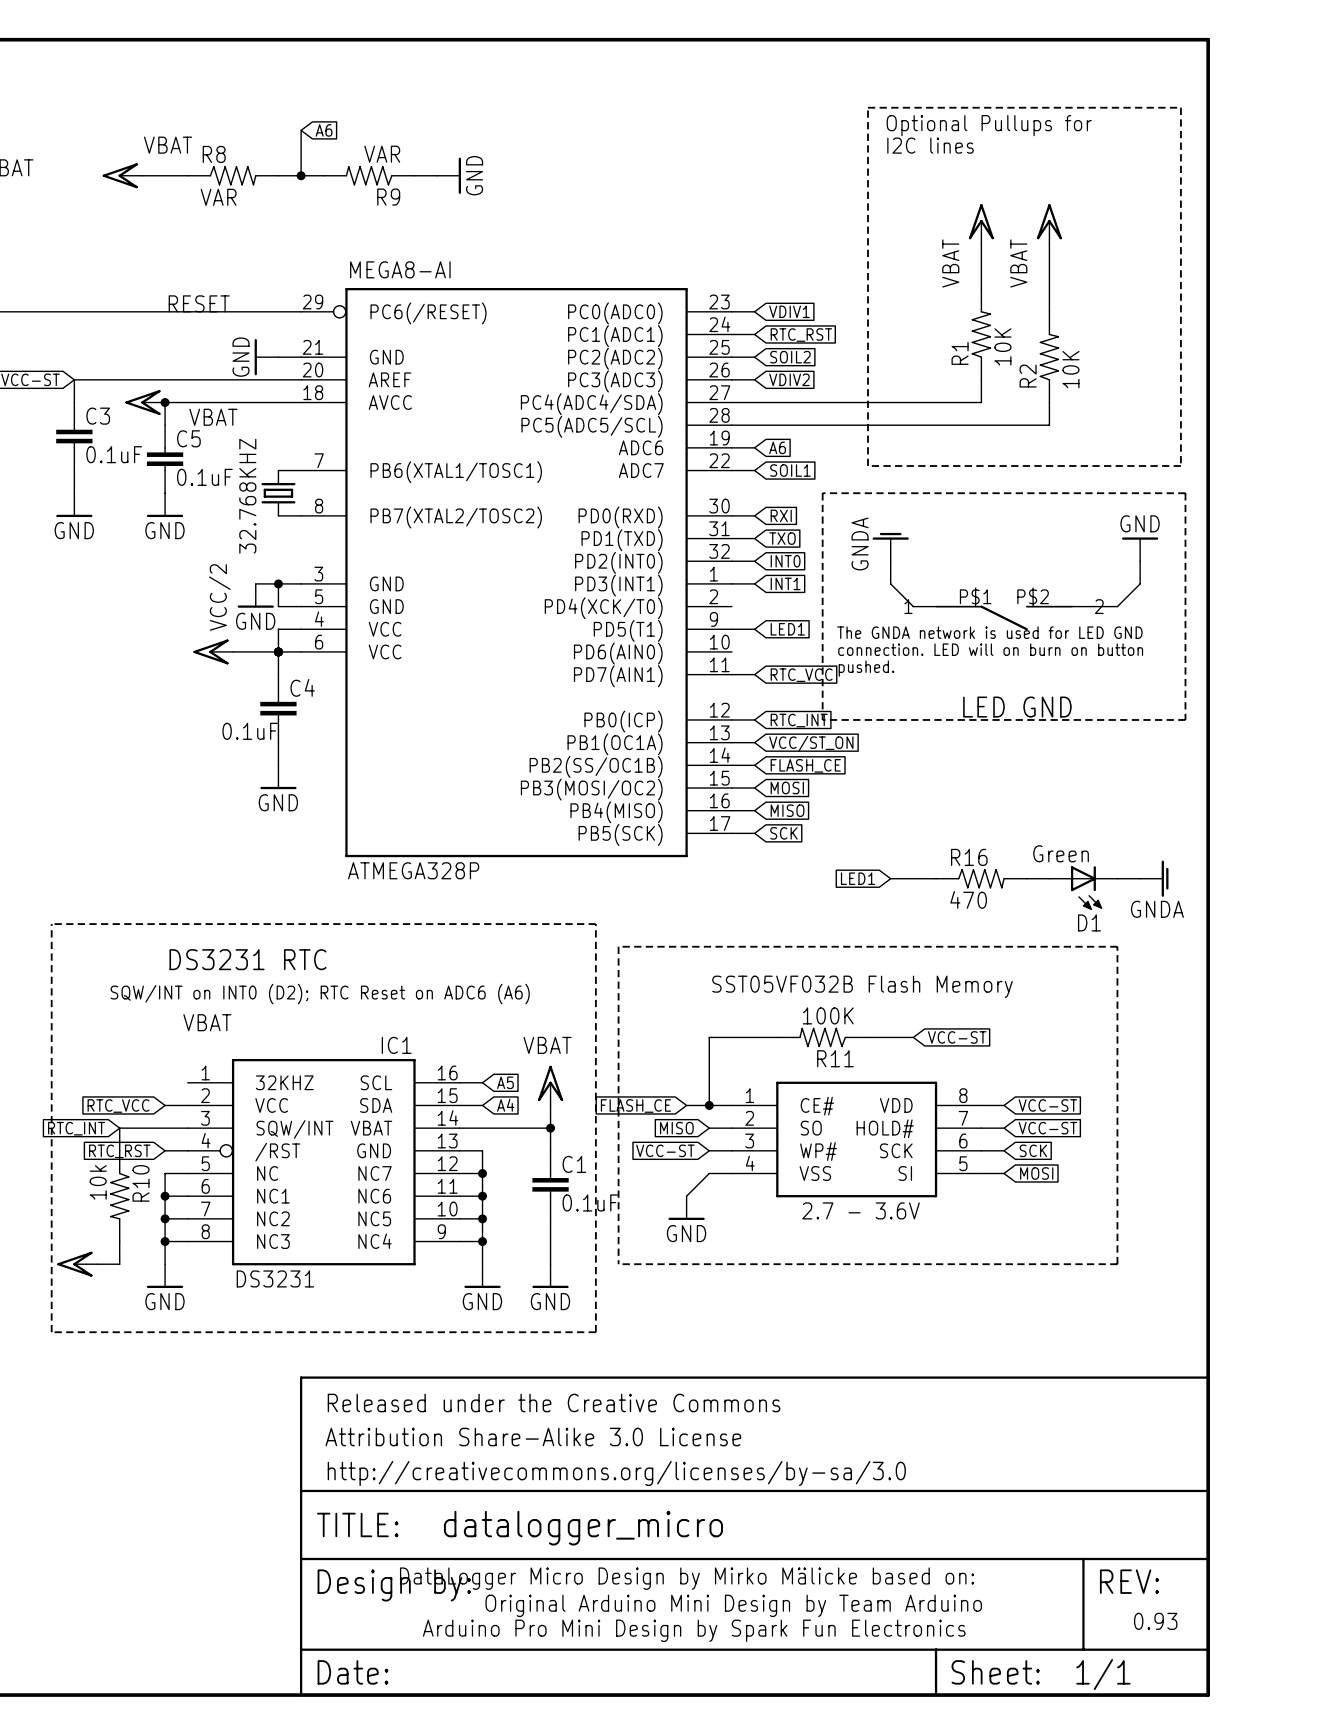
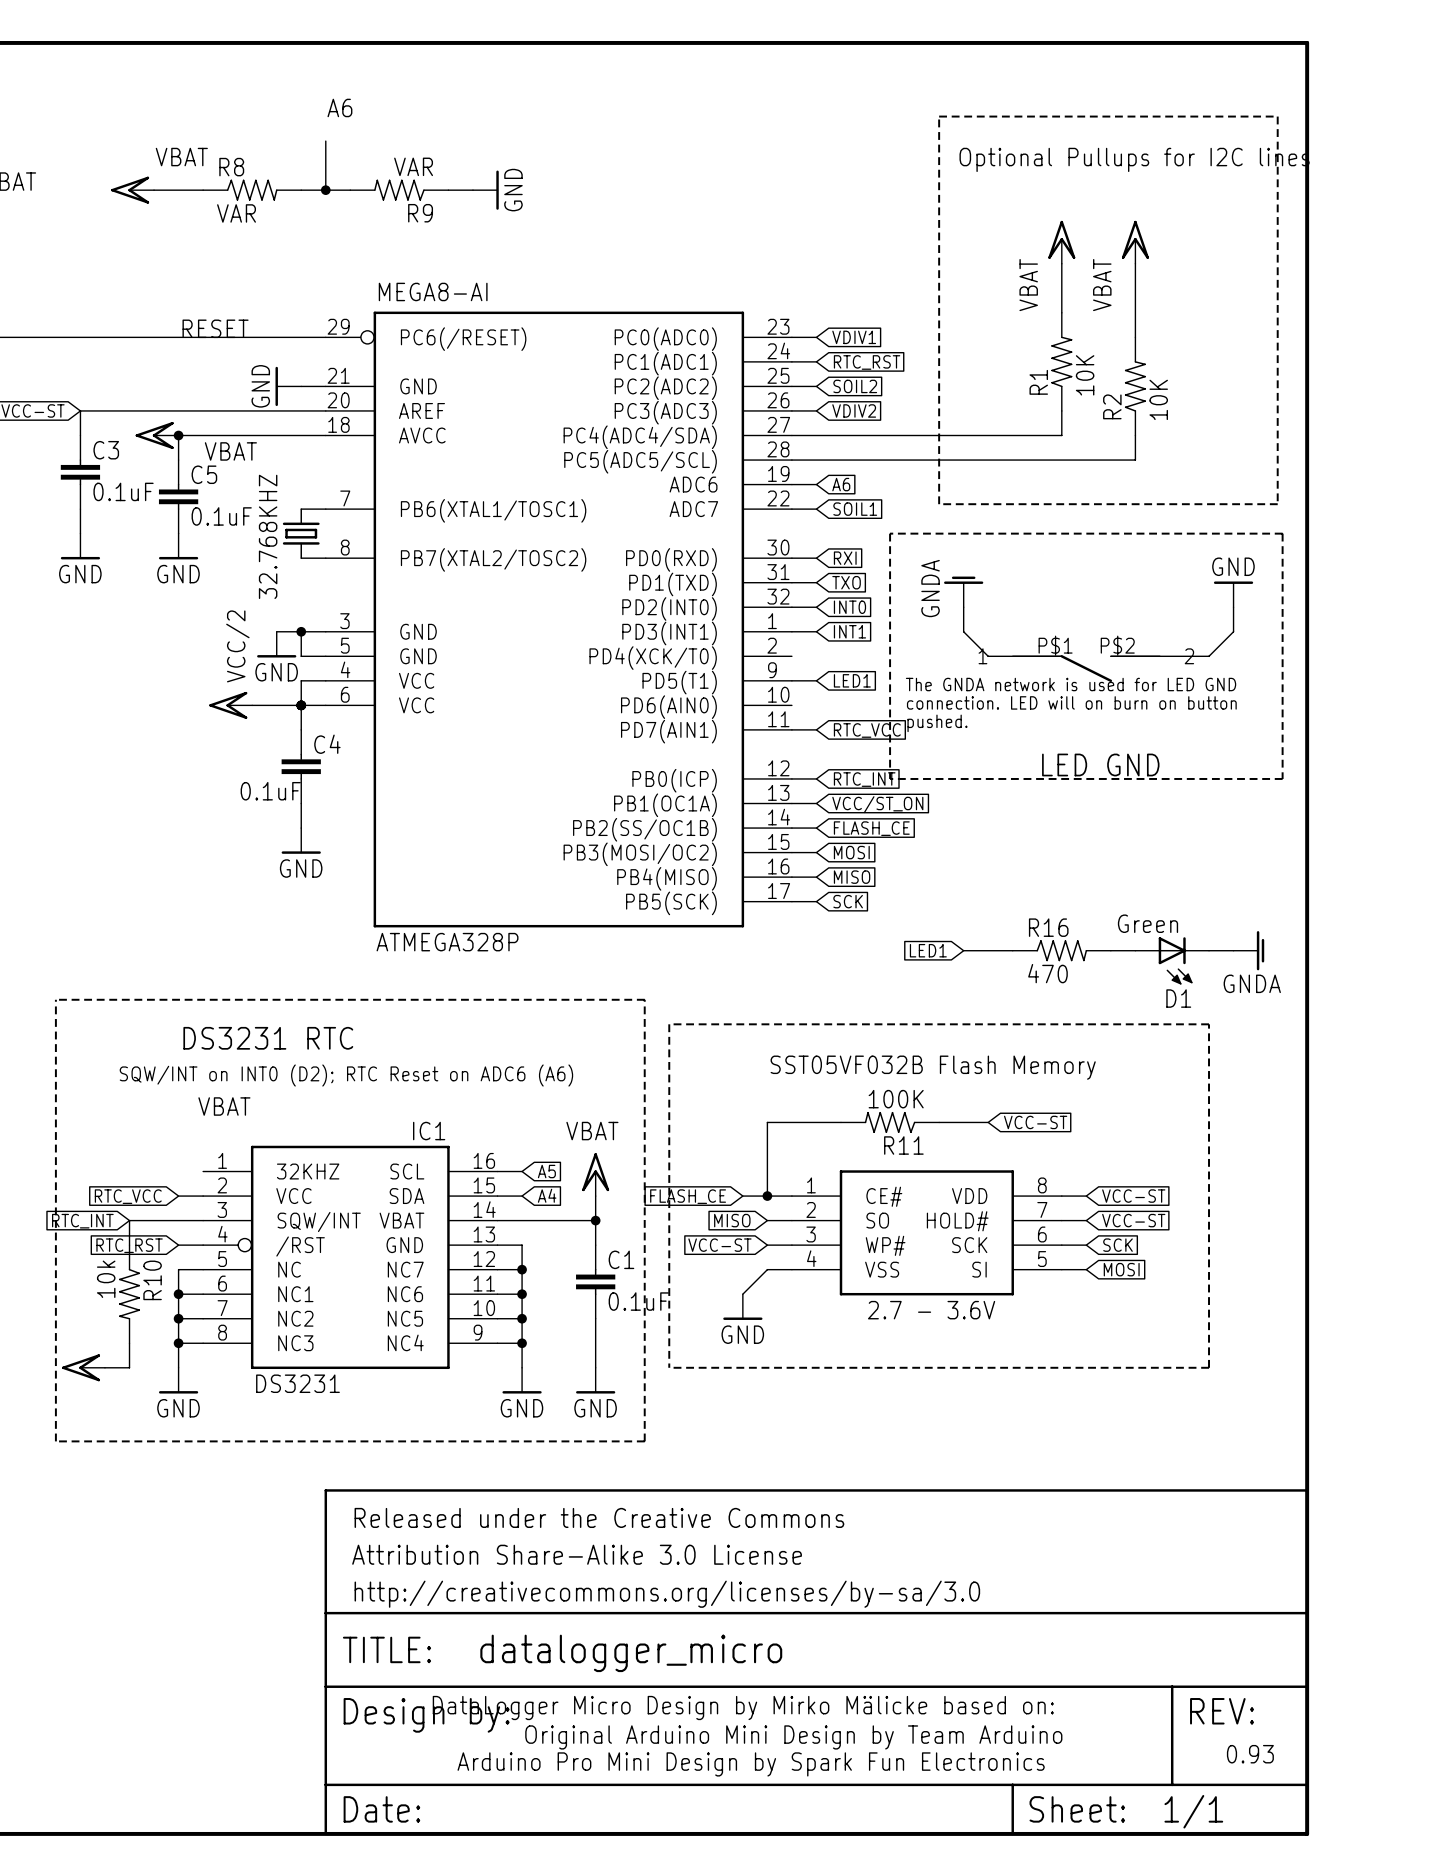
label: none -> A6 (339, 107)
text: Optional Pullups for (989, 125) -> none
global label: A6 (324, 130) -> none
text: I2C lines (930, 145) -> Optional Pullups for I2C lines (1134, 159)

